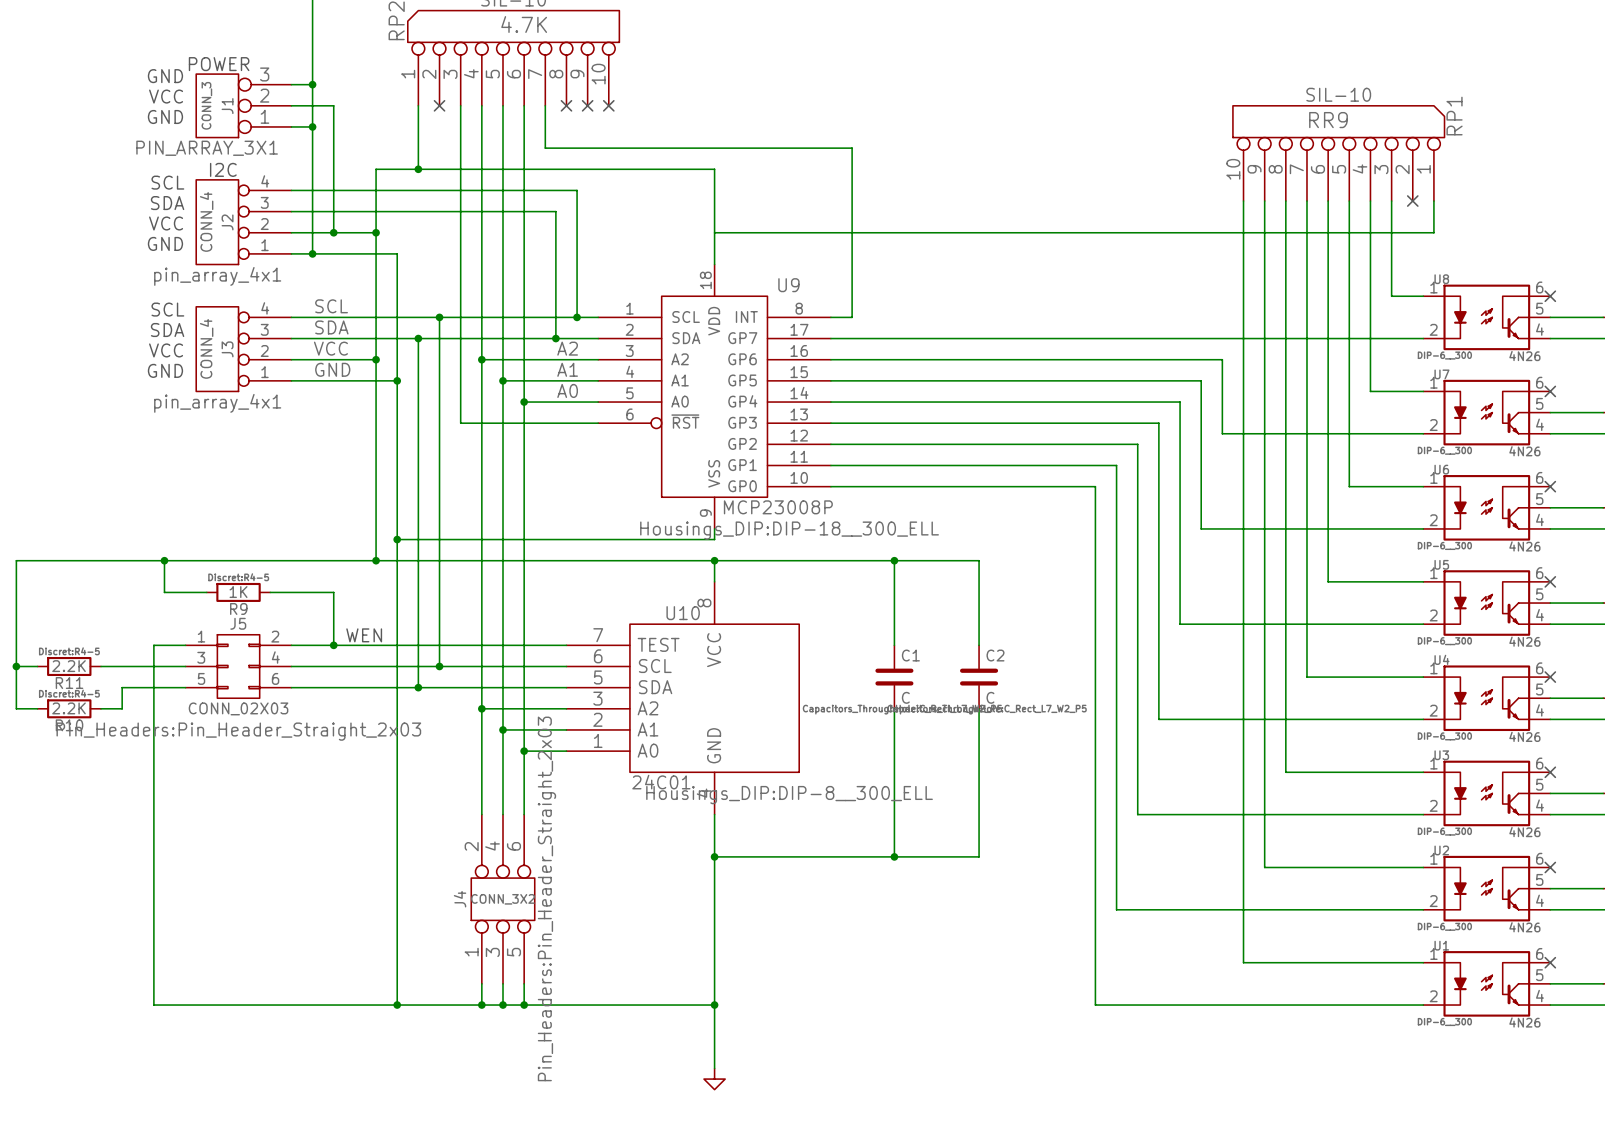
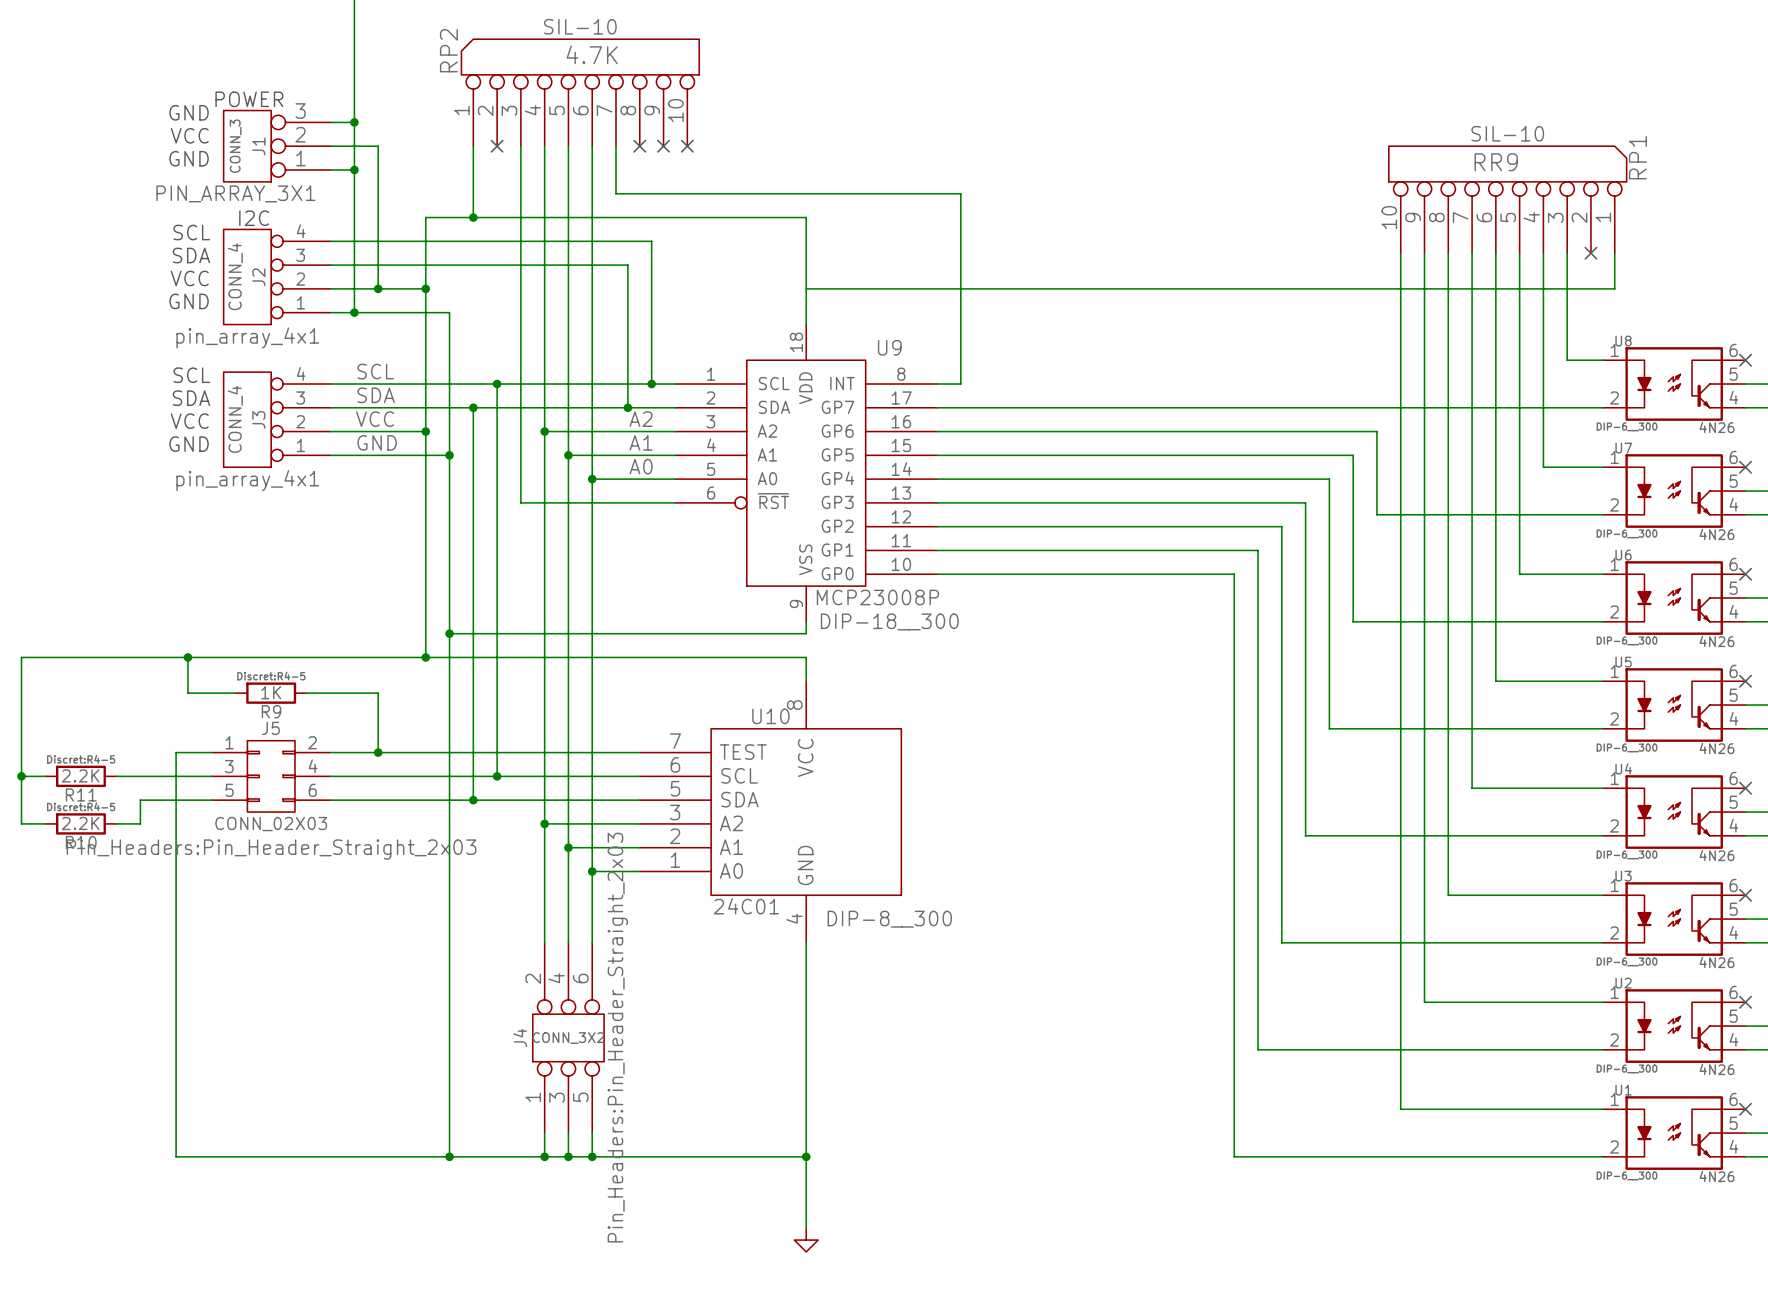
U9 text: Housings_DIP:DIP-18__300_ELL (789, 530) -> DIP-18__300 (889, 621)
wire: (714, 560) (979, 560) (979, 645) -> none
junction: (714, 560) -> none
wire: (894, 560) (894, 645) -> none
junction: (894, 560) -> none
text: WEN (364, 635) -> none
C1: C (894, 677) -> none
C2: C (979, 677) -> none
wire: (894, 708) (894, 856) -> none
wire: (979, 708) (979, 856) (714, 856) -> none
U10 text: Housings_DIP:DIP-8__300_ELL (789, 795) -> DIP-8__300 (889, 919)
junction: (714, 856) -> none
junction: (894, 856) -> none

